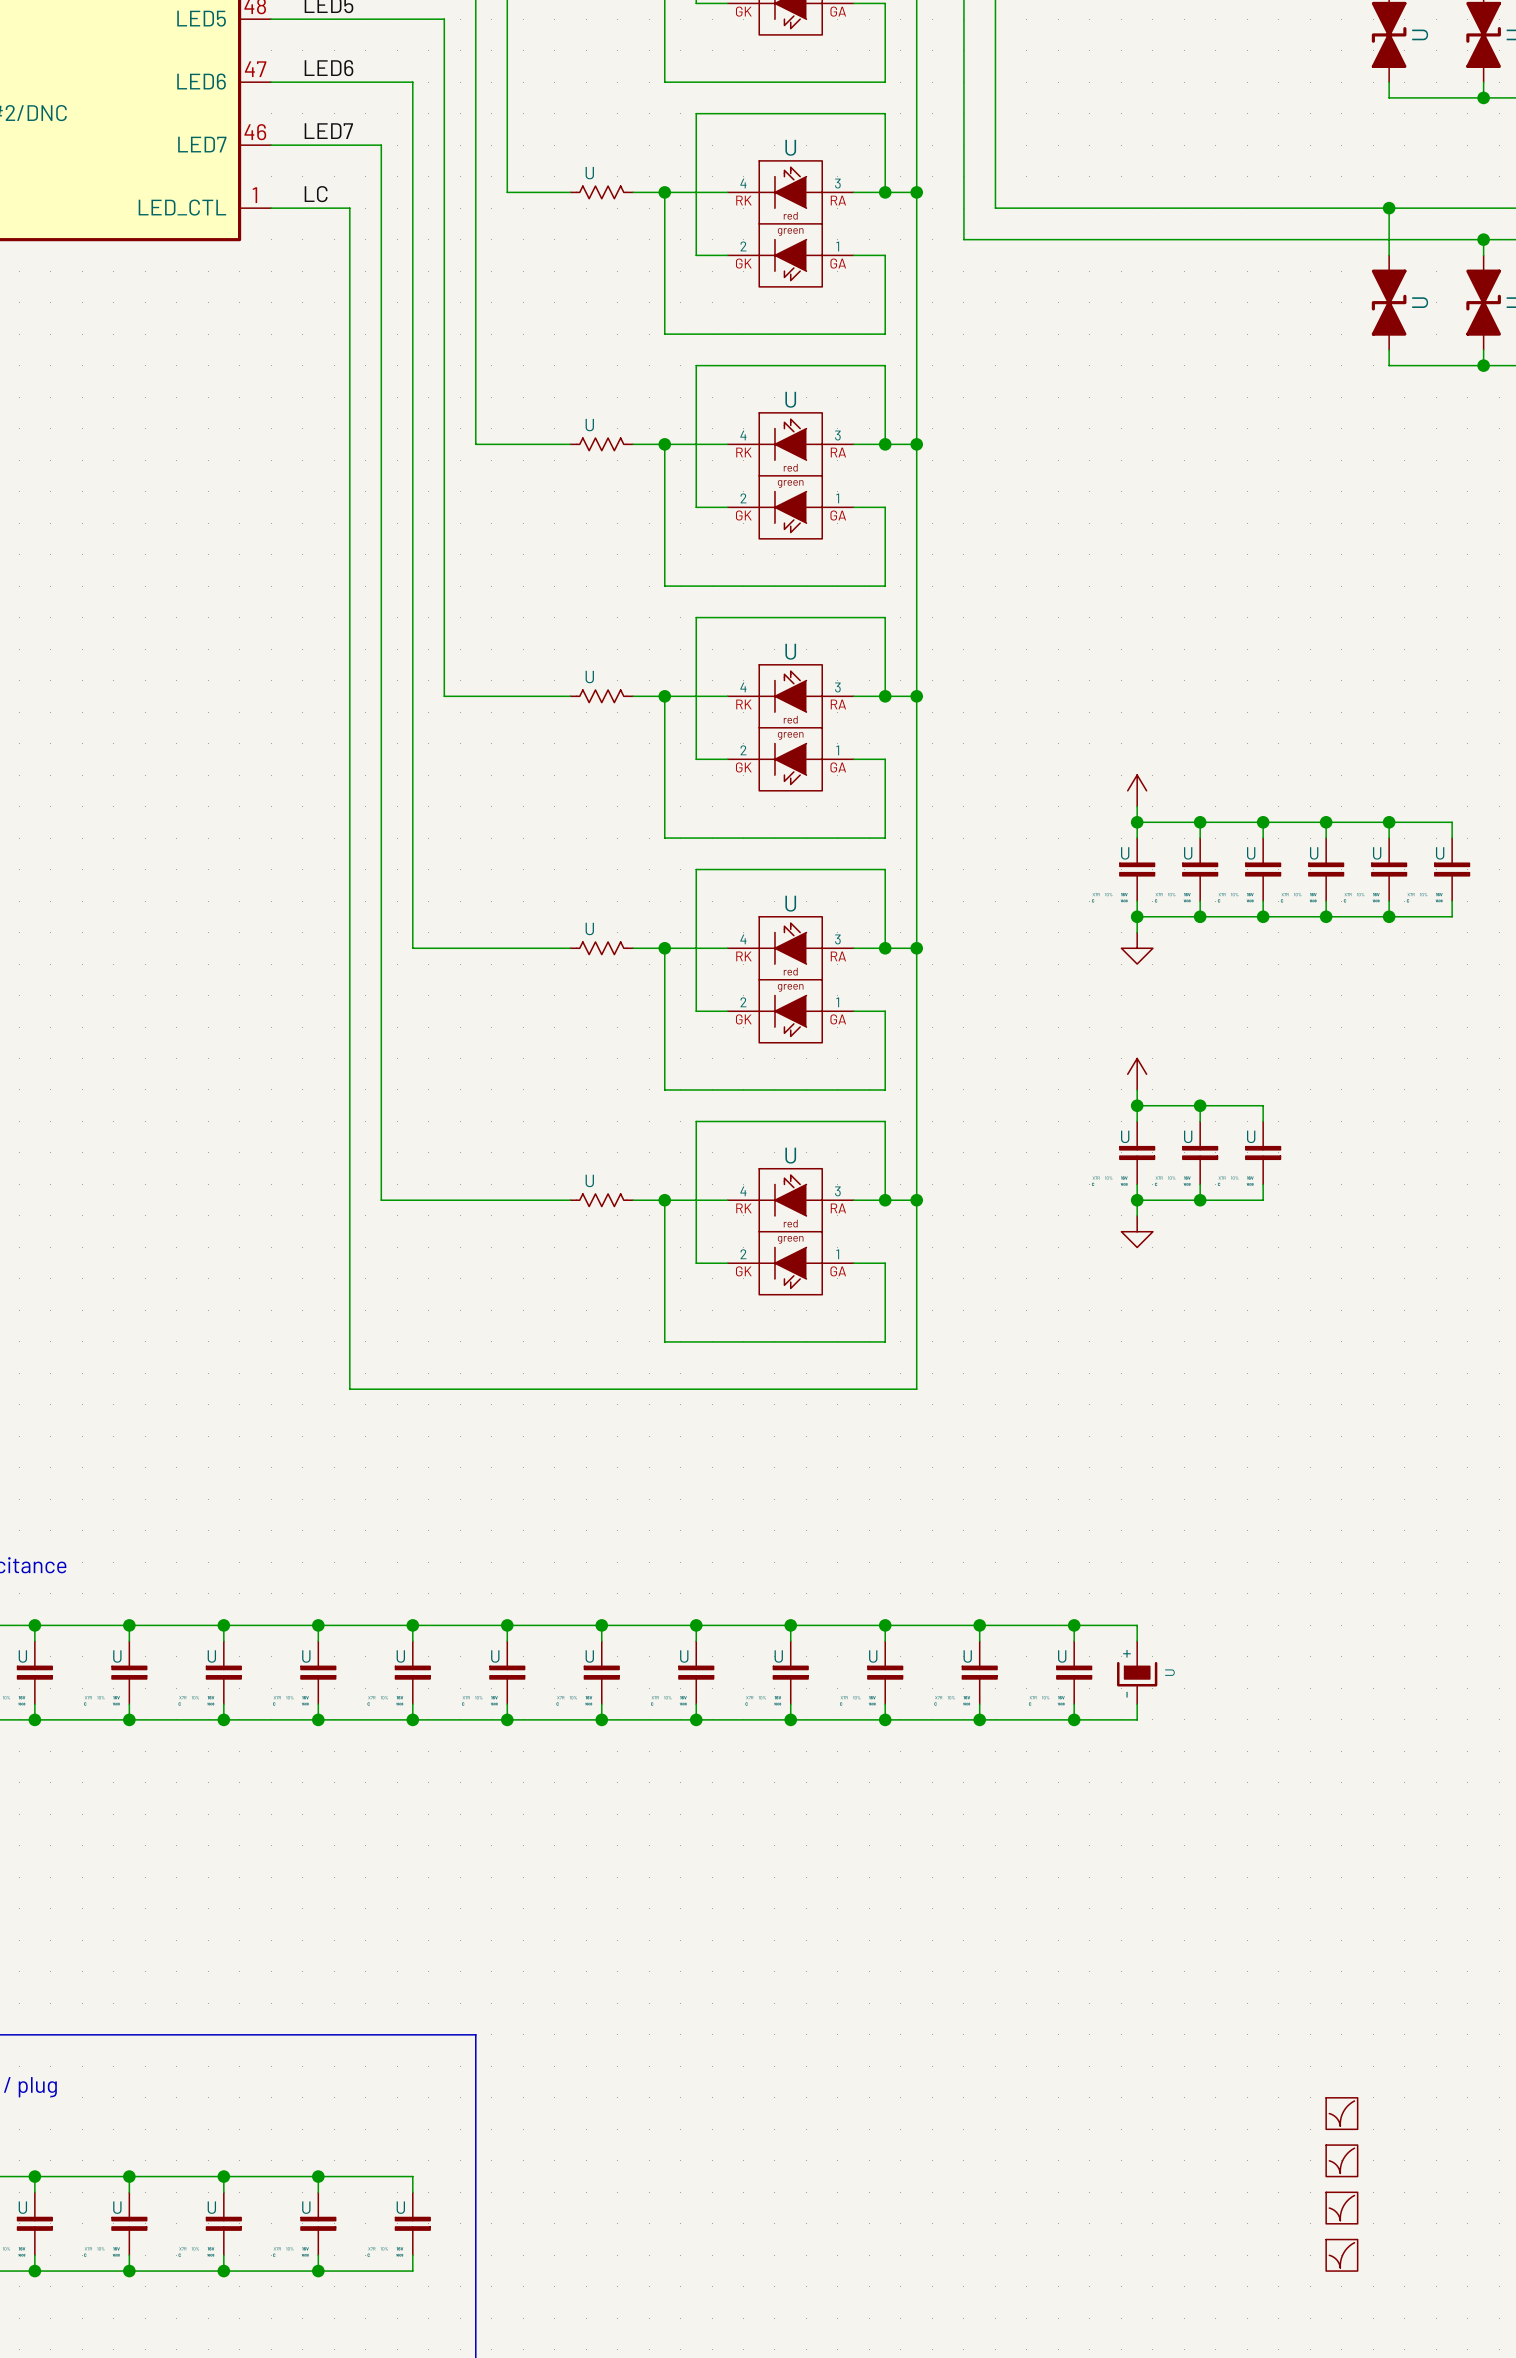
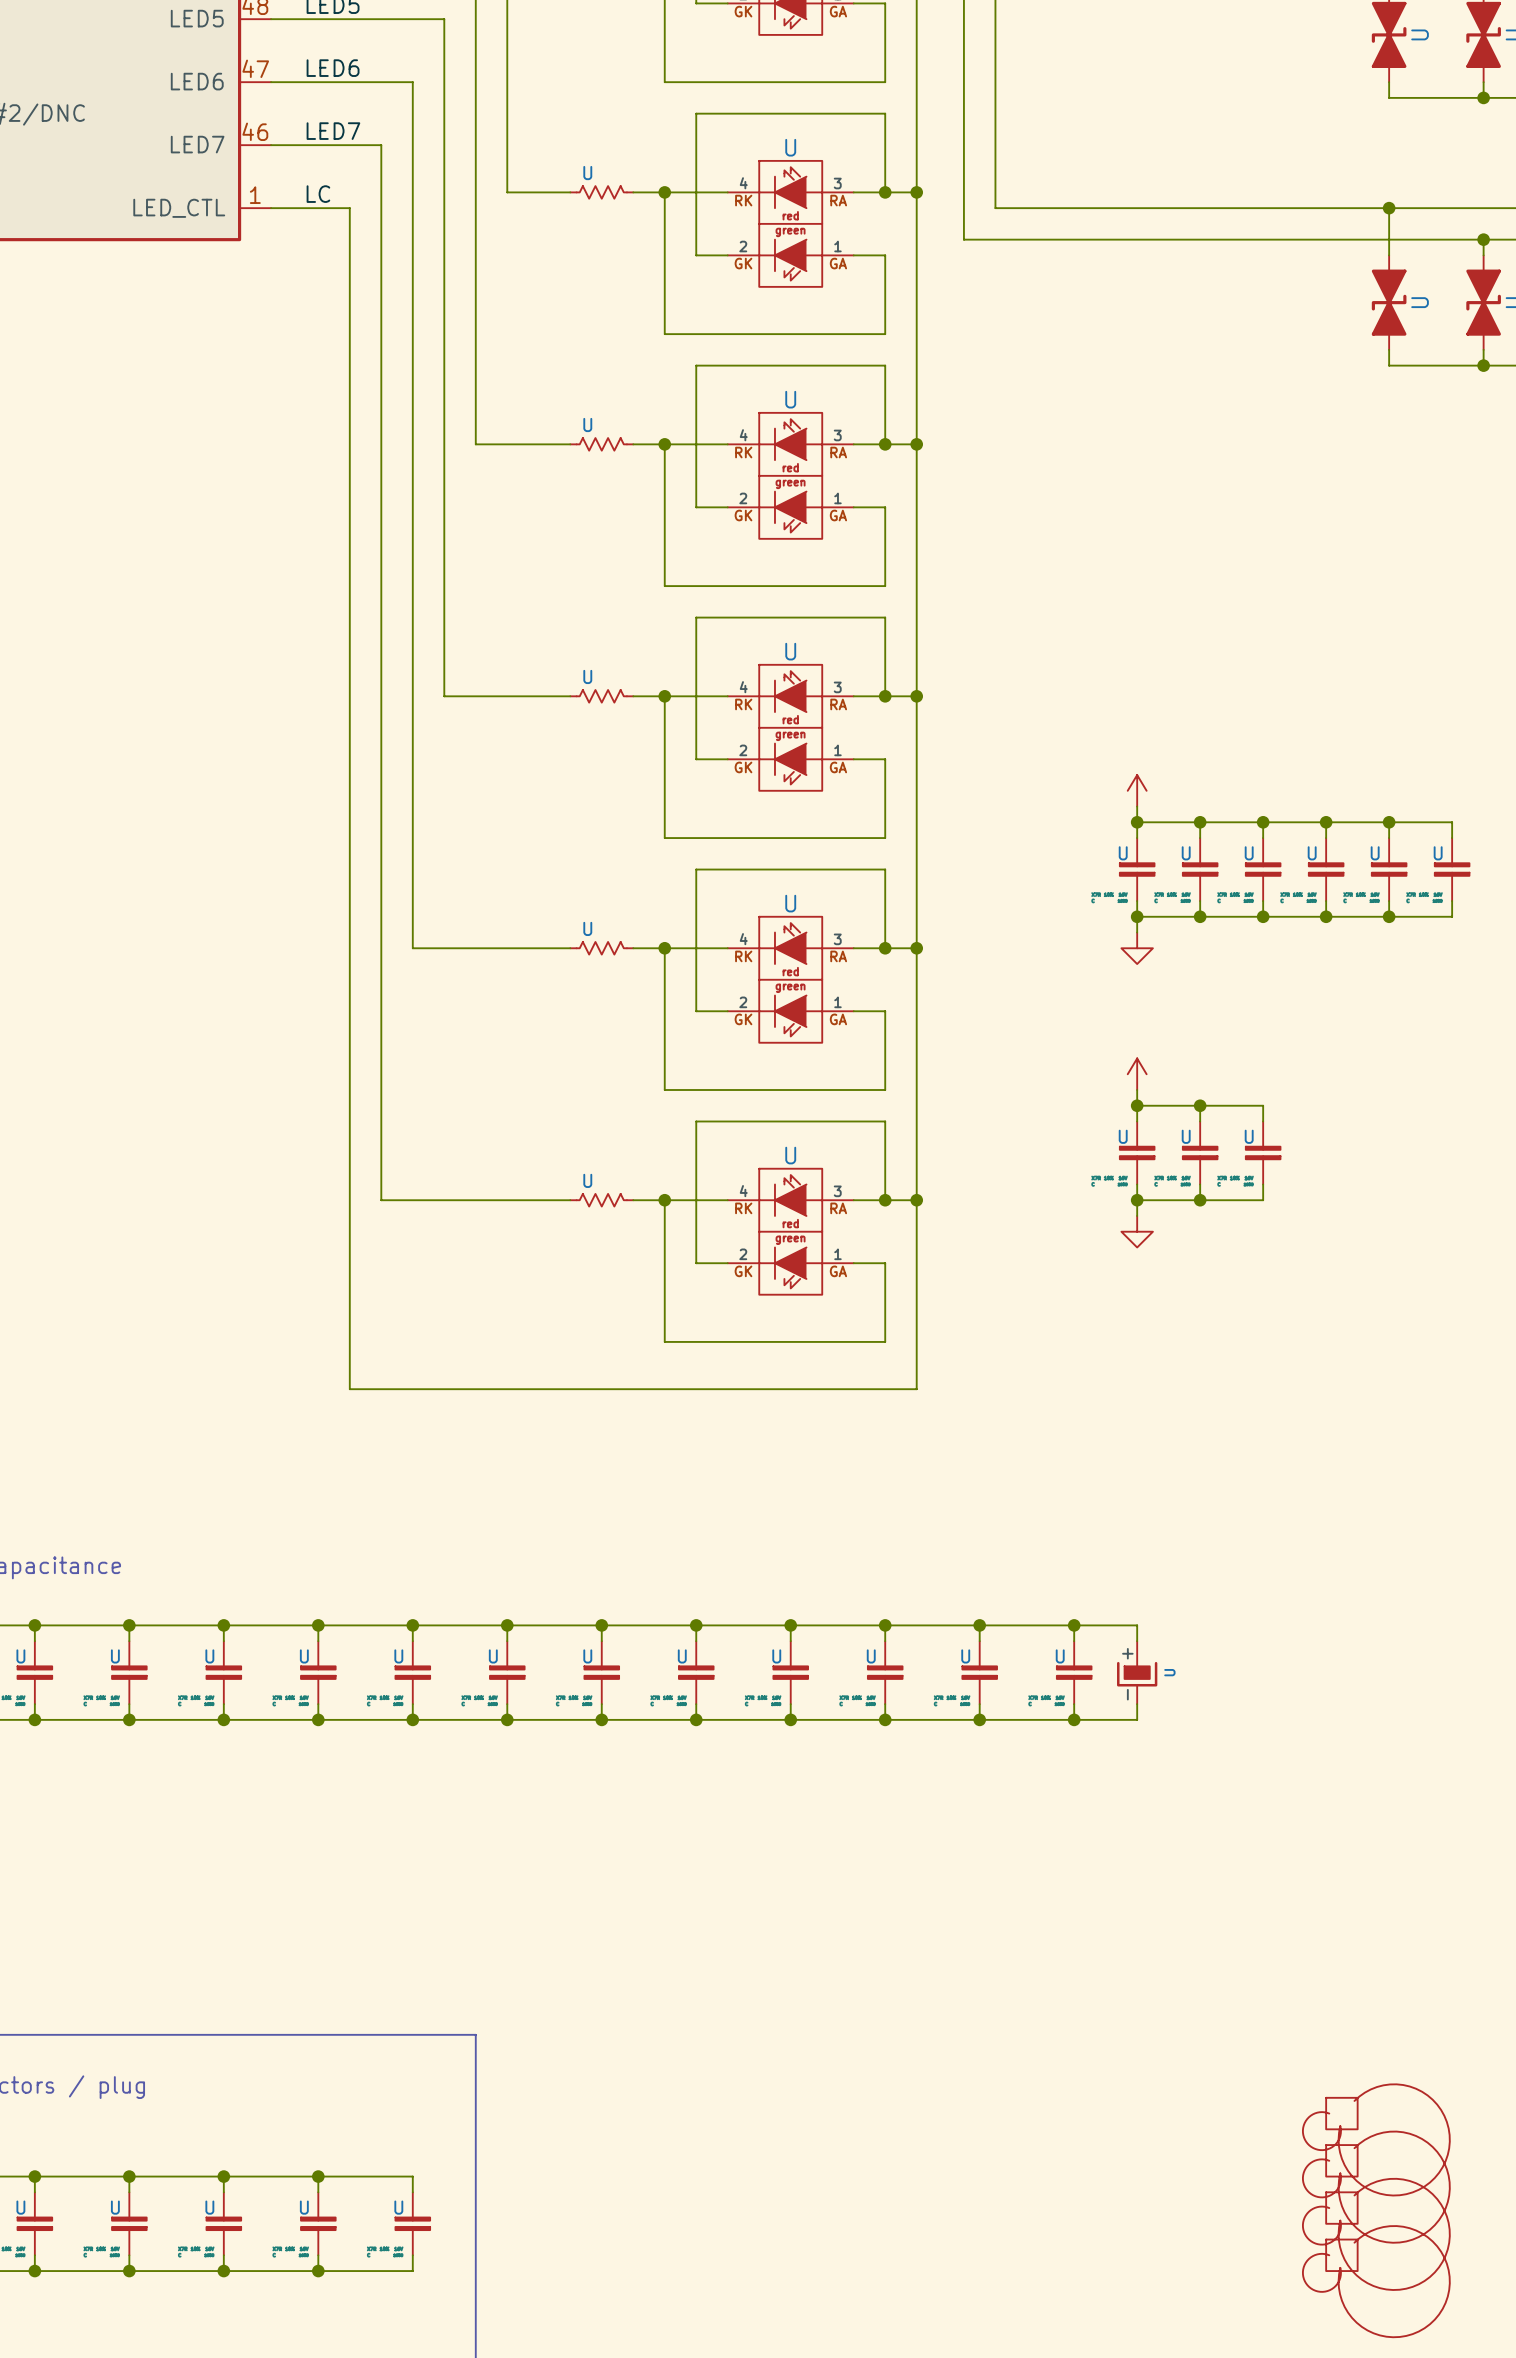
part: (1341, 2113) -> none
part: none -> (1376, 2139)
part: (1341, 2160) -> none
part: none -> (1376, 2187)
part: (1341, 2208) -> none
part: none -> (1376, 2234)
part: (1341, 2255) -> none
part: none -> (1376, 2281)

